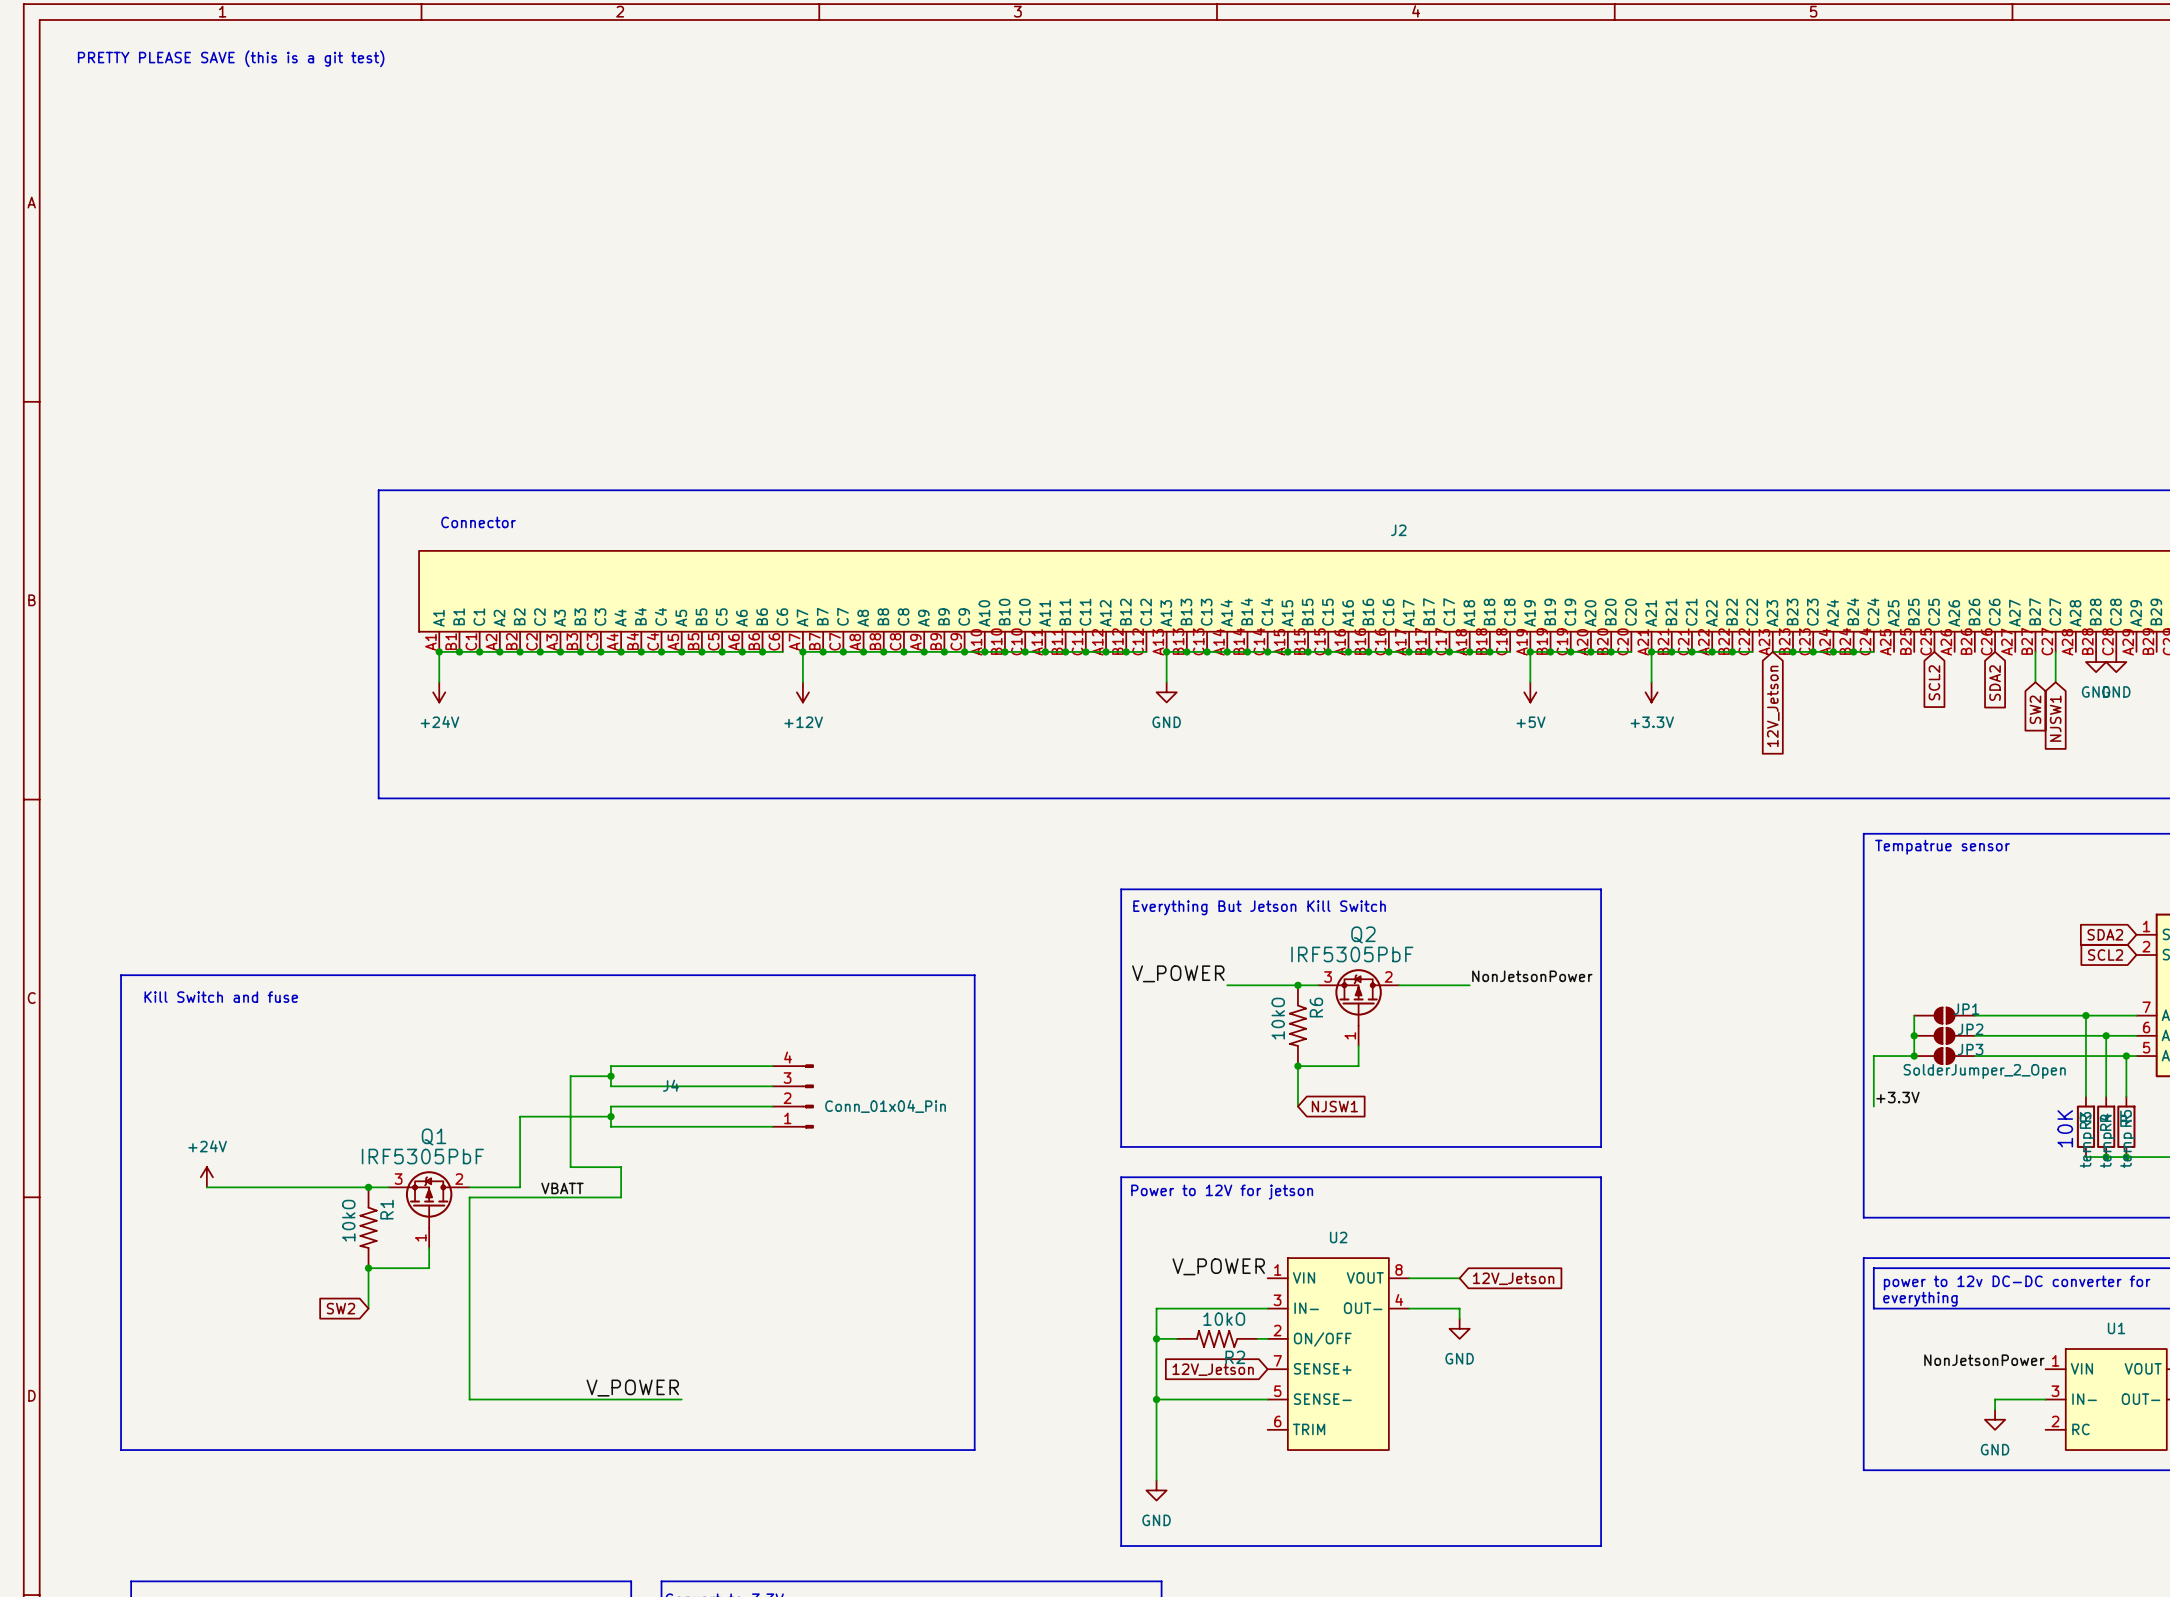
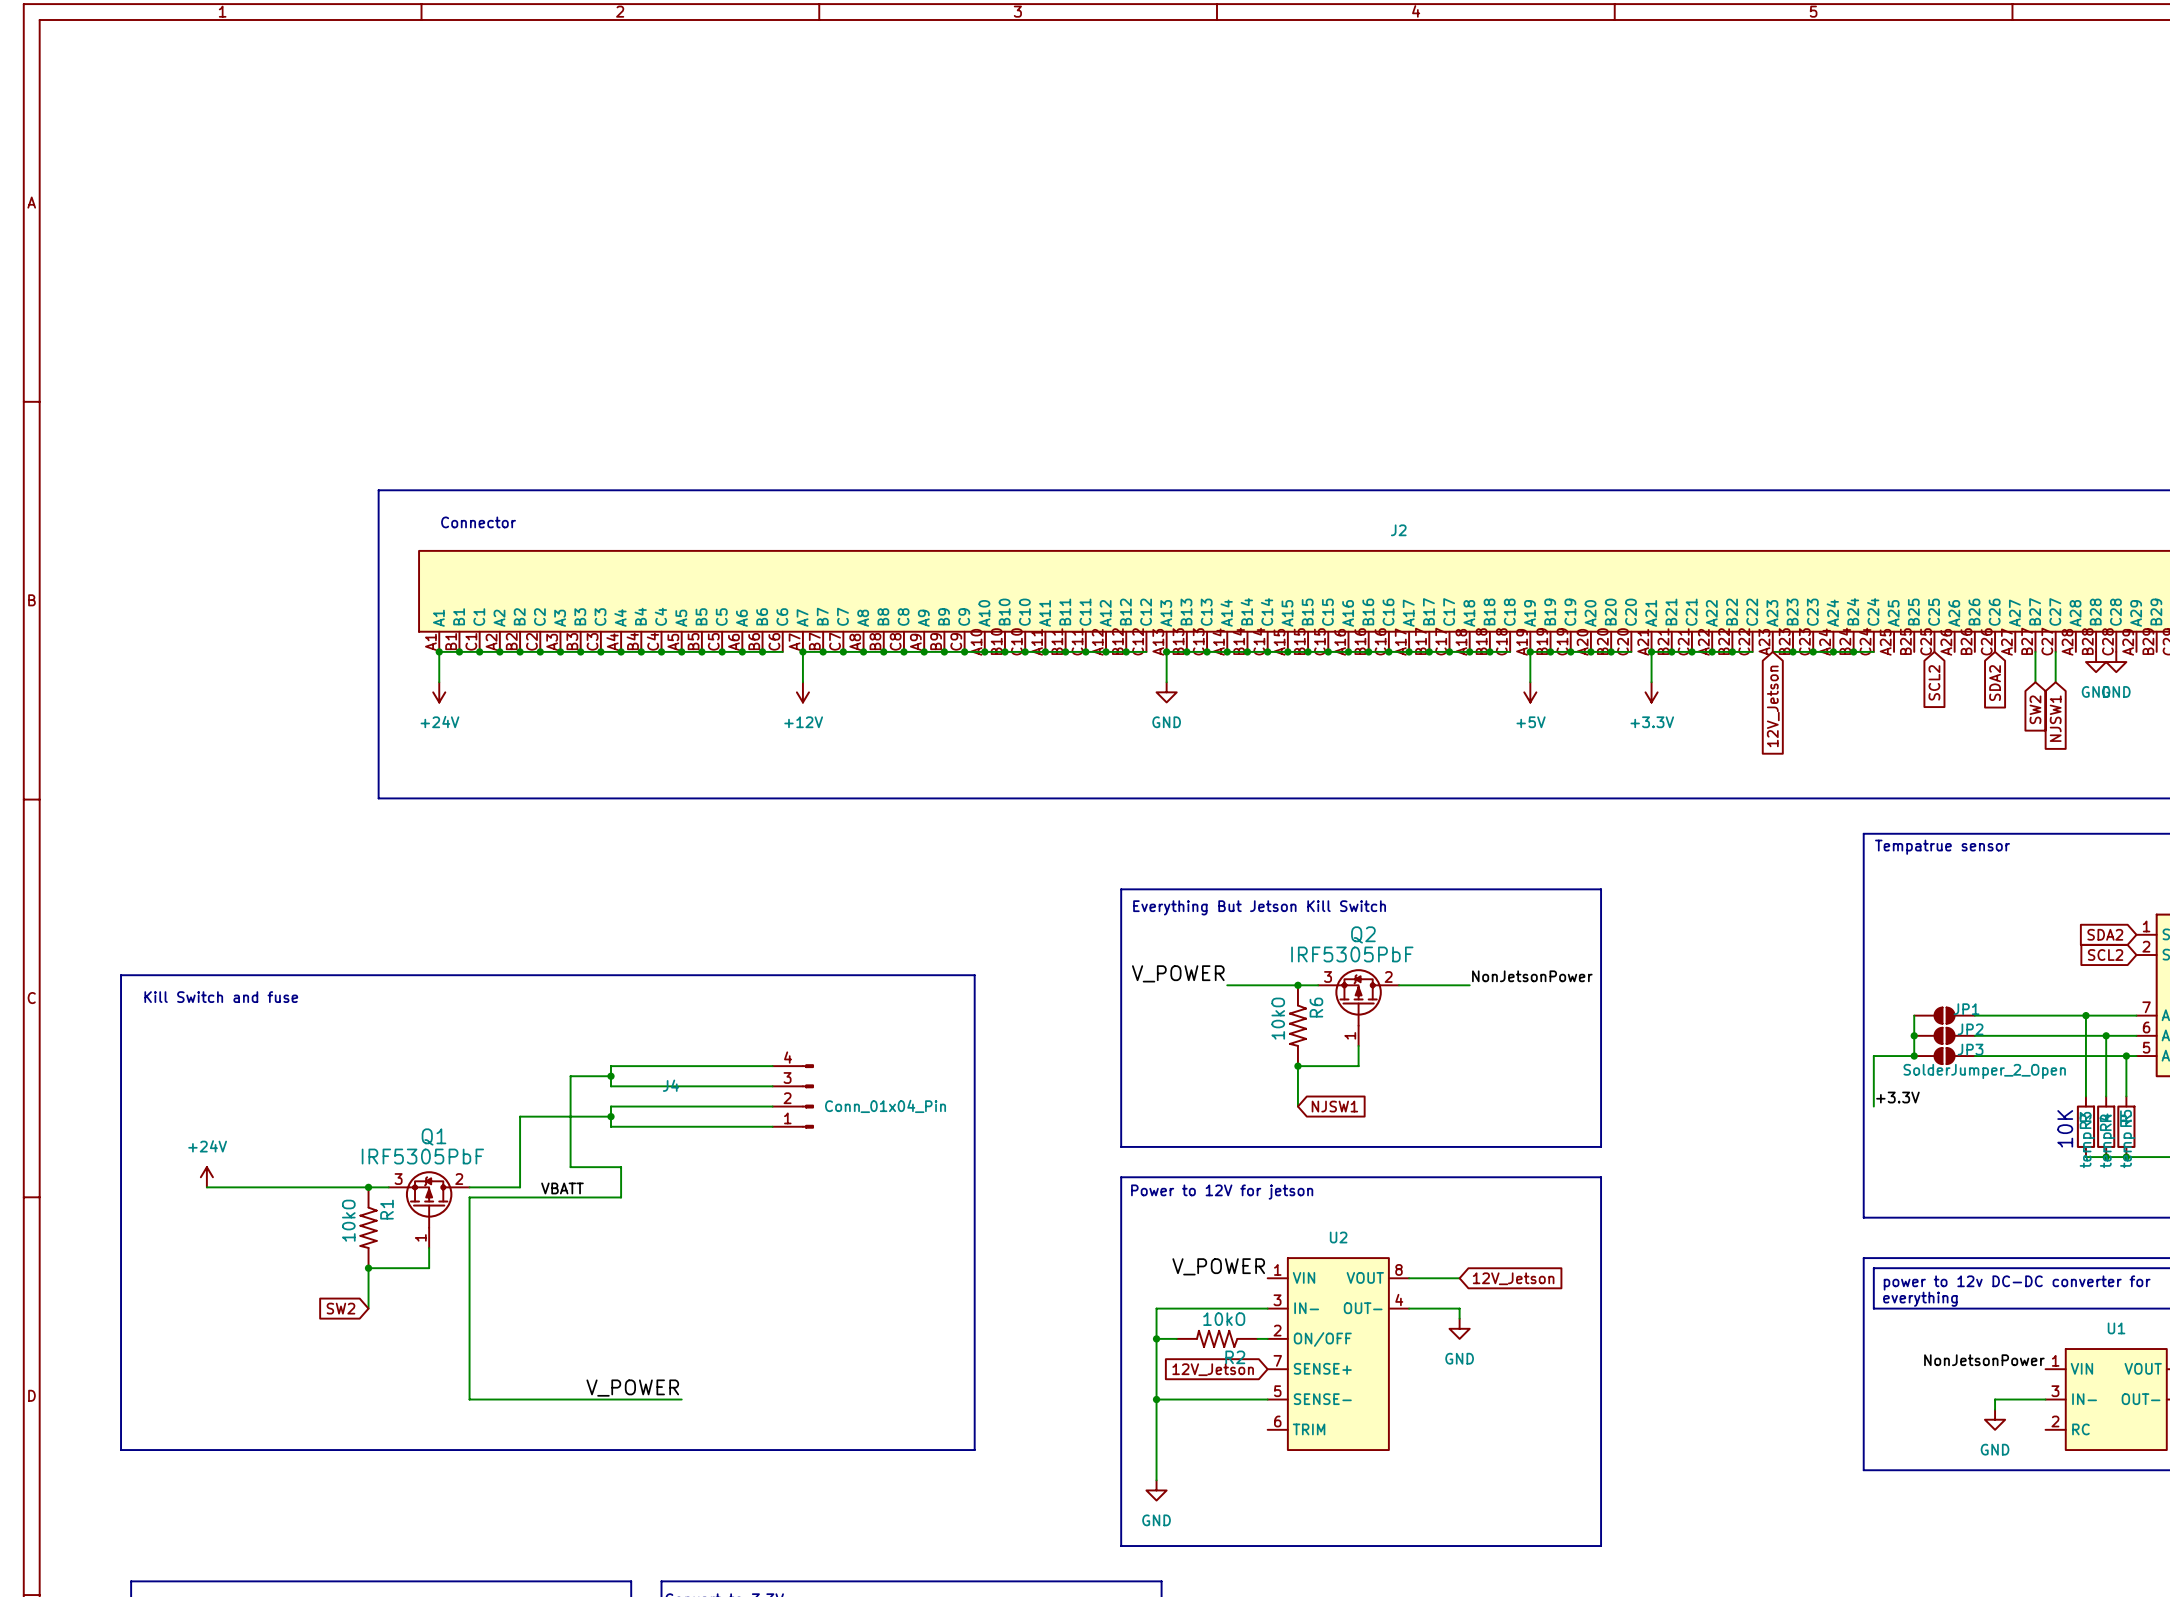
text: PRETTY PLEASE SAVE (this is a git test) (231, 58) -> none

